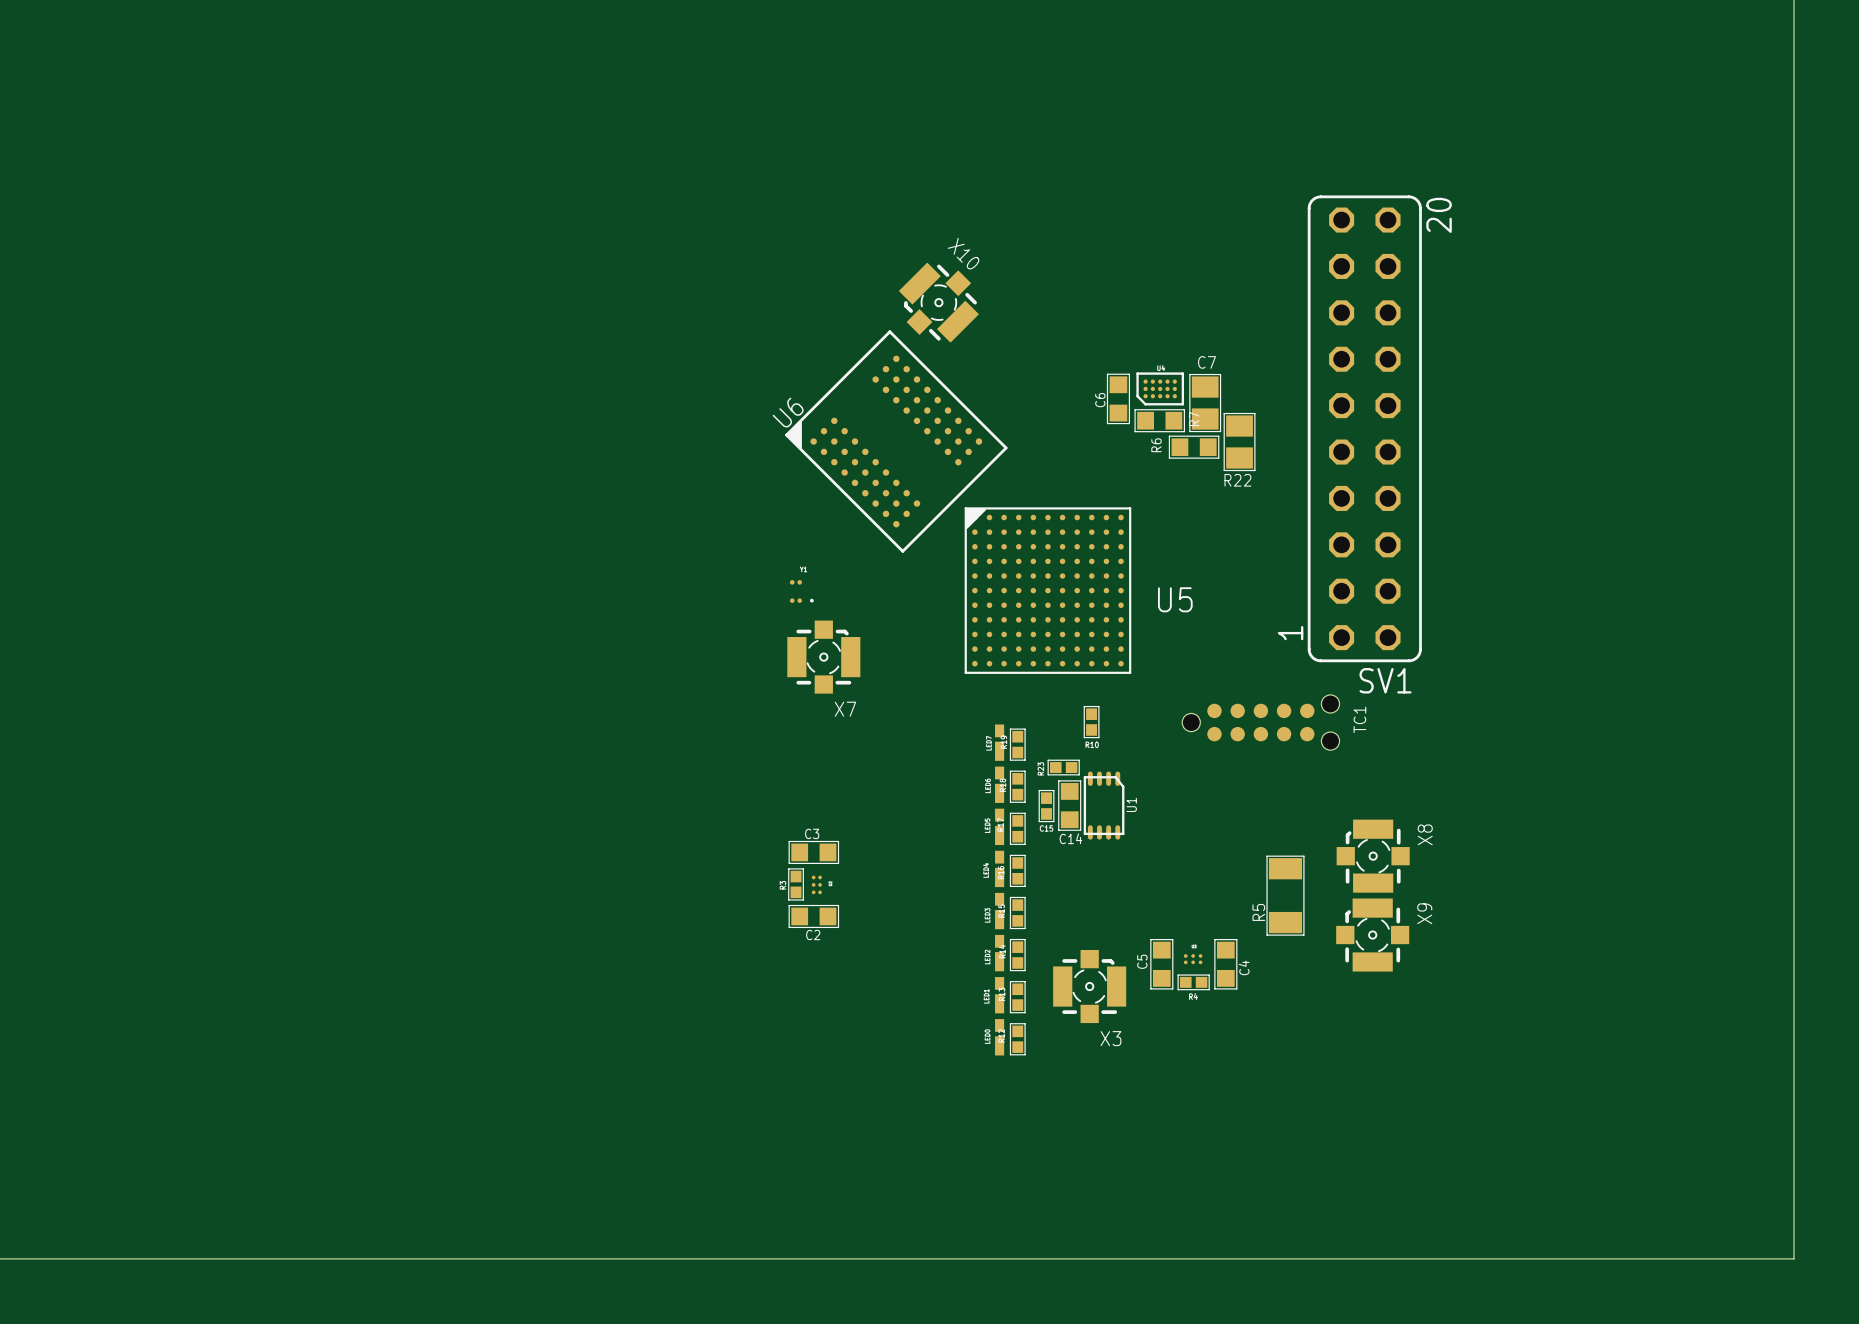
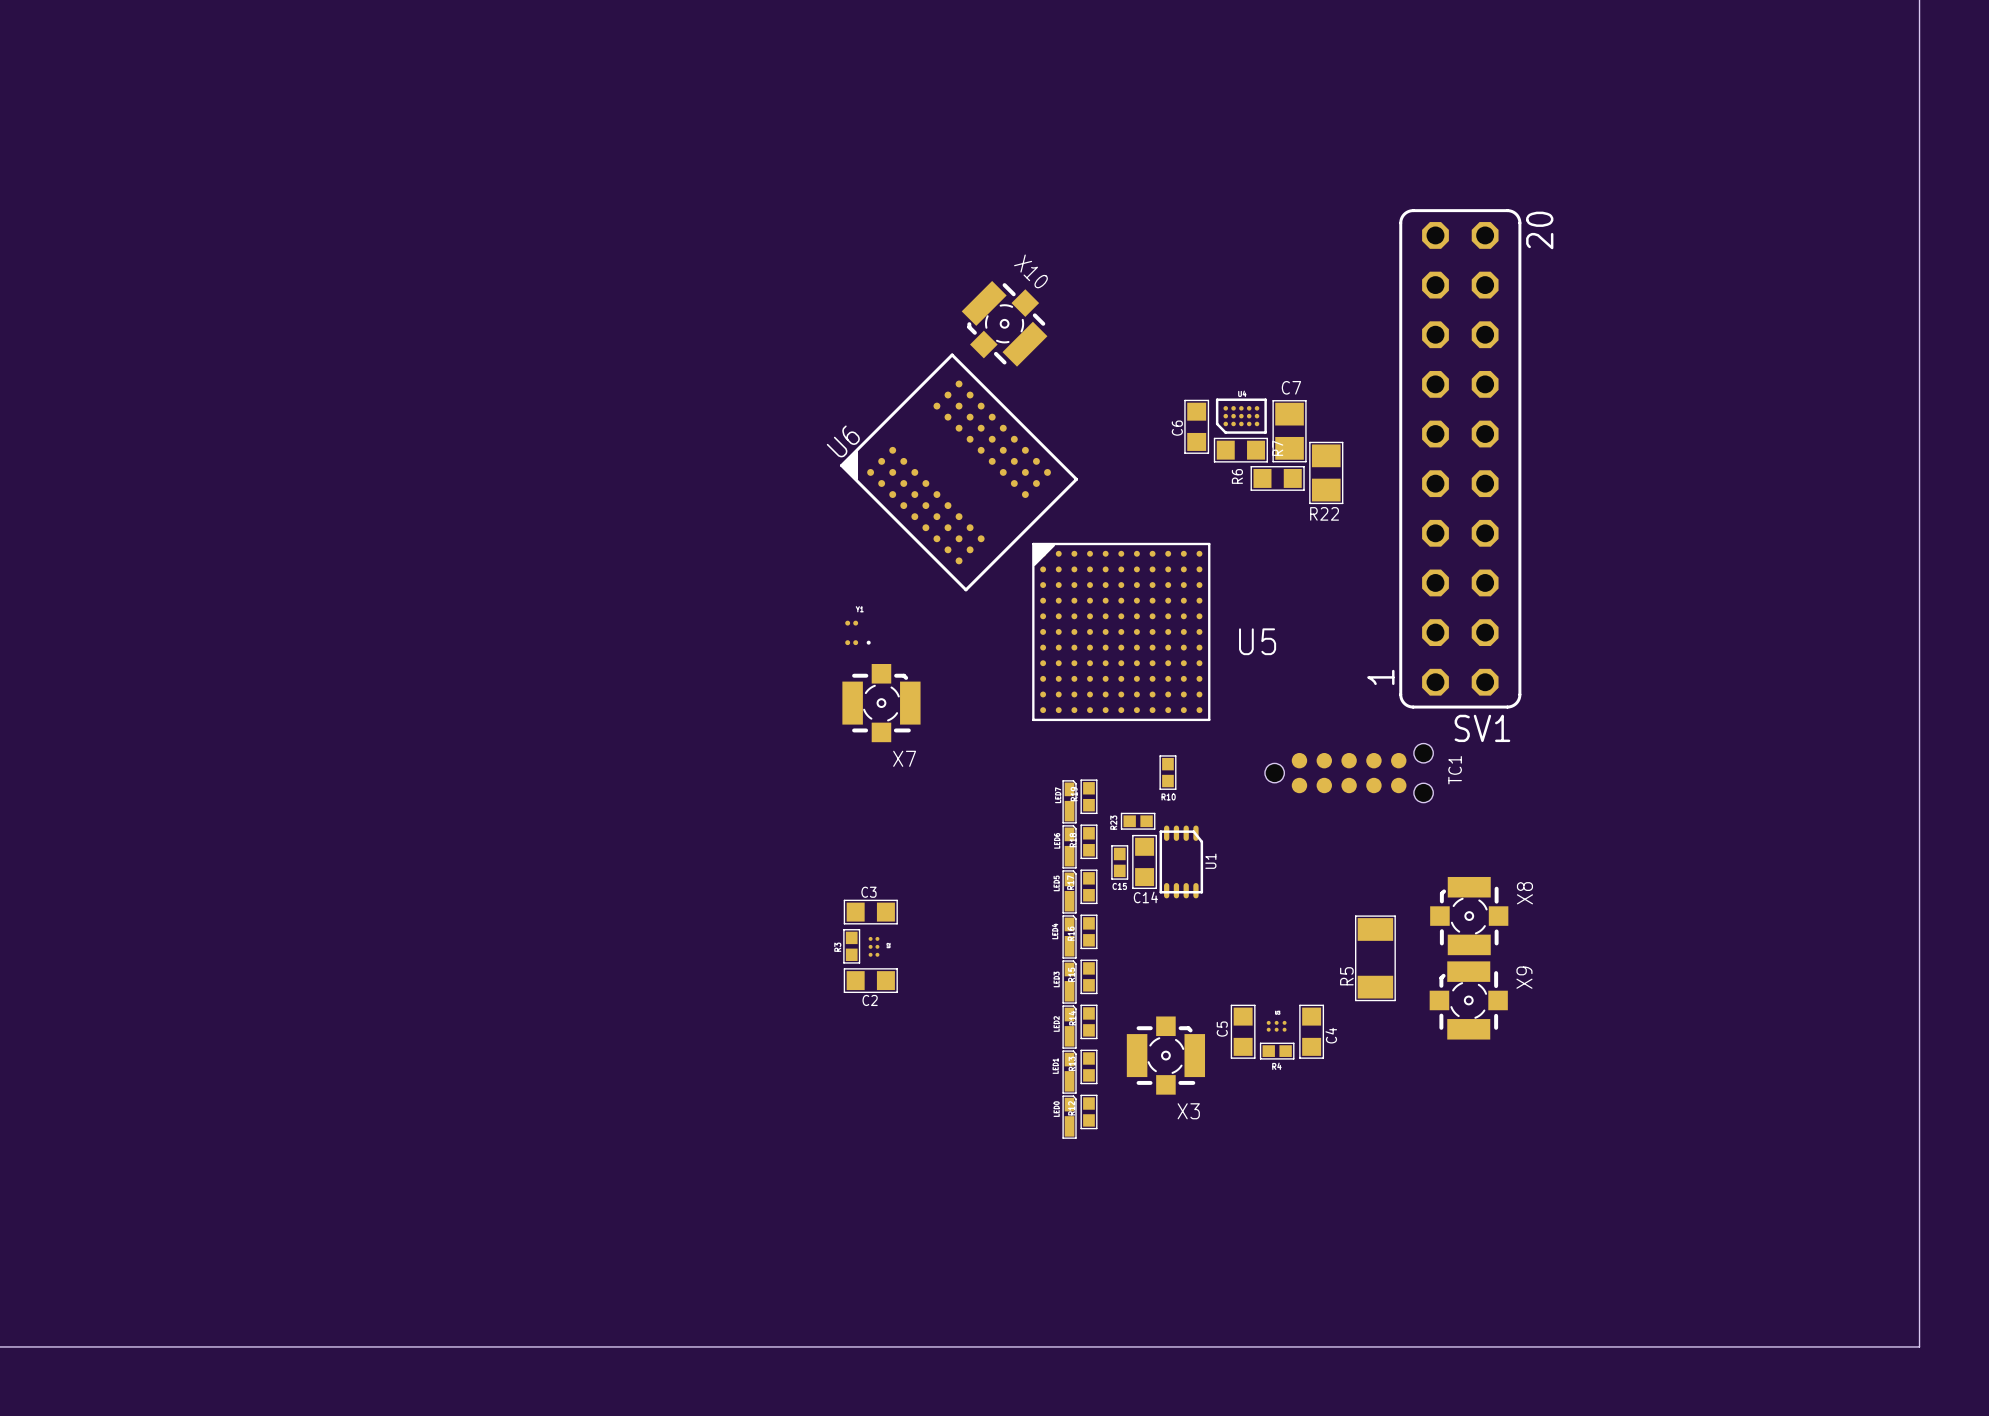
part footprint: [995, 724, 1005, 761] -> [1062, 780, 1077, 824]
part footprint: [995, 766, 1005, 803] -> [1062, 825, 1077, 869]
part footprint: [995, 808, 1005, 846] -> [1062, 870, 1077, 914]
part footprint: [995, 850, 1005, 888] -> [1062, 915, 1077, 959]
part footprint: [995, 892, 1005, 930] -> [1062, 960, 1077, 1004]
part footprint: [995, 934, 1005, 972] -> [1062, 1005, 1077, 1049]
part footprint: [995, 977, 1005, 1014] -> [1062, 1050, 1077, 1094]
part footprint: [995, 1019, 1005, 1056] -> [1062, 1095, 1077, 1139]

